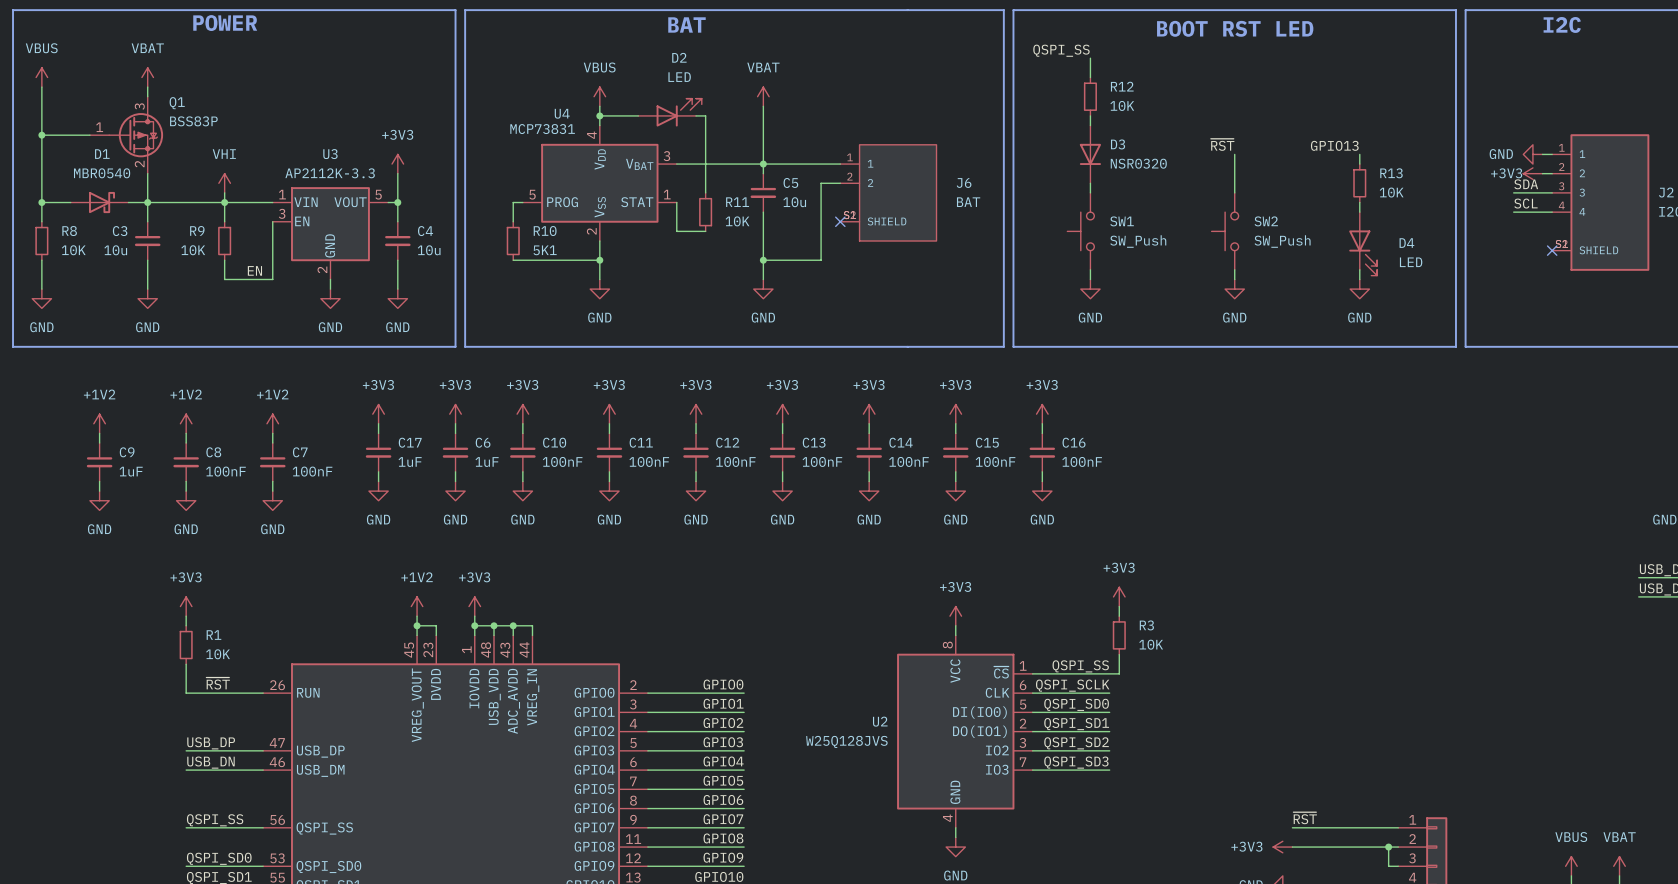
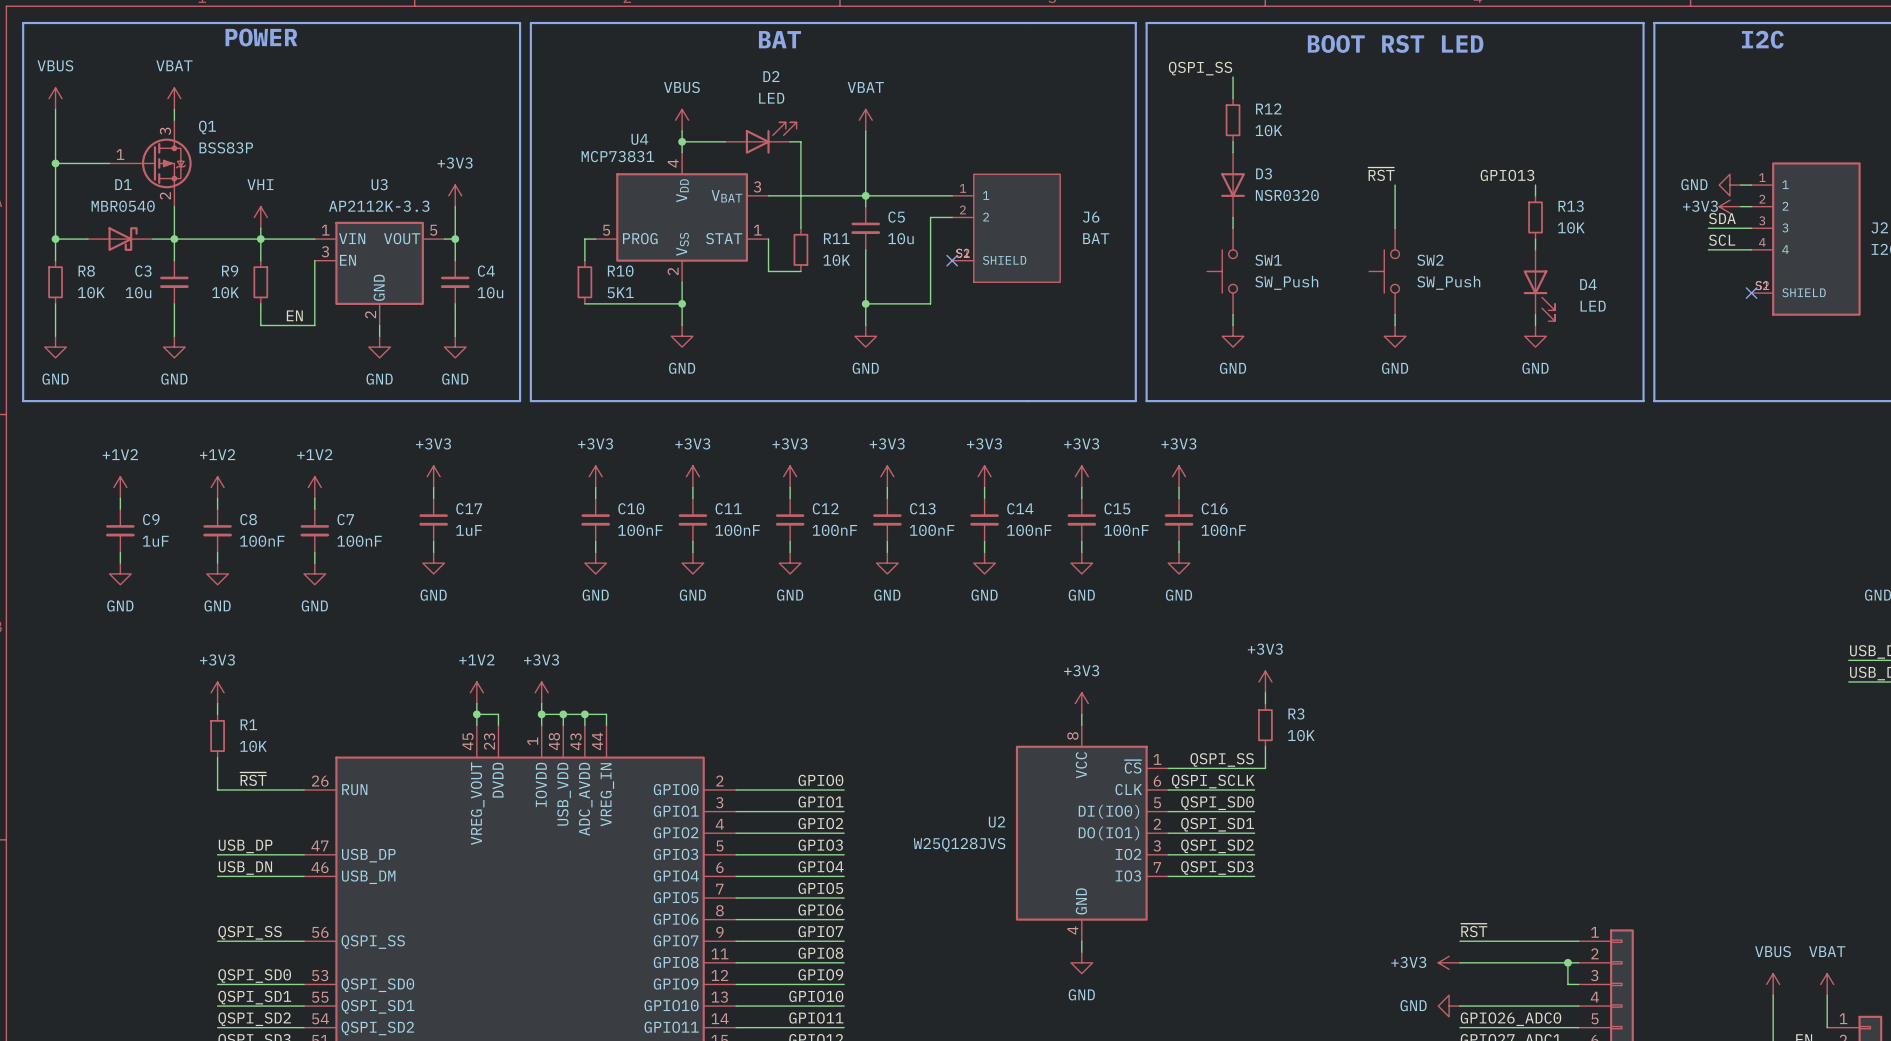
power symbol: +3V3 (455, 414) -> none
wire: (455, 423) (455, 433) -> none
C6: 1uF (455, 452) -> none
wire: (455, 471) (455, 481) -> none
power symbol: GND (455, 491) -> none

